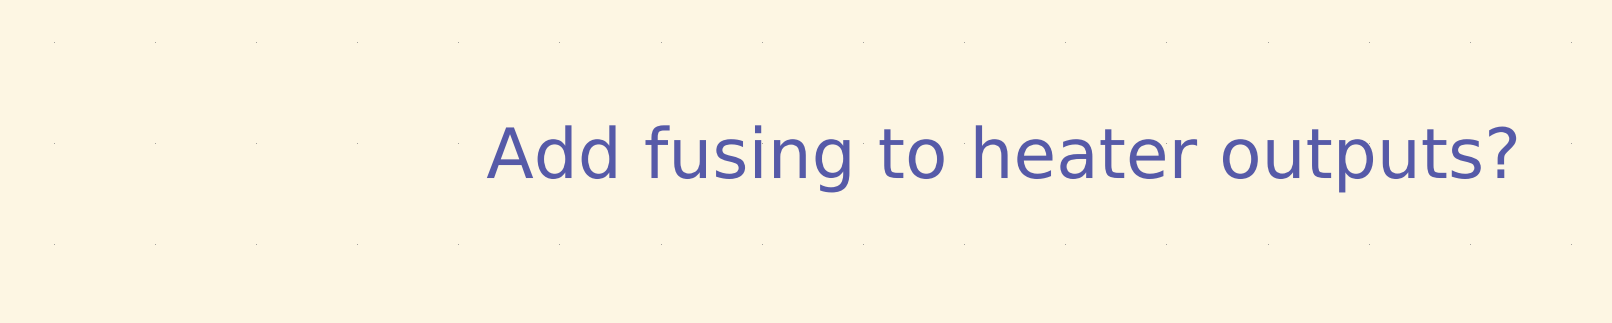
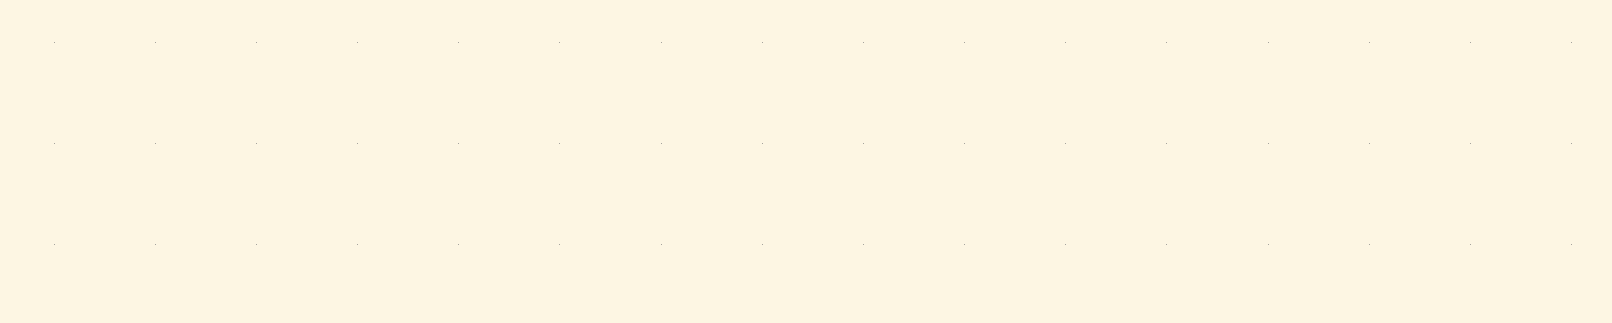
text: Add fusing to heater outputs? (1001, 158) -> none

